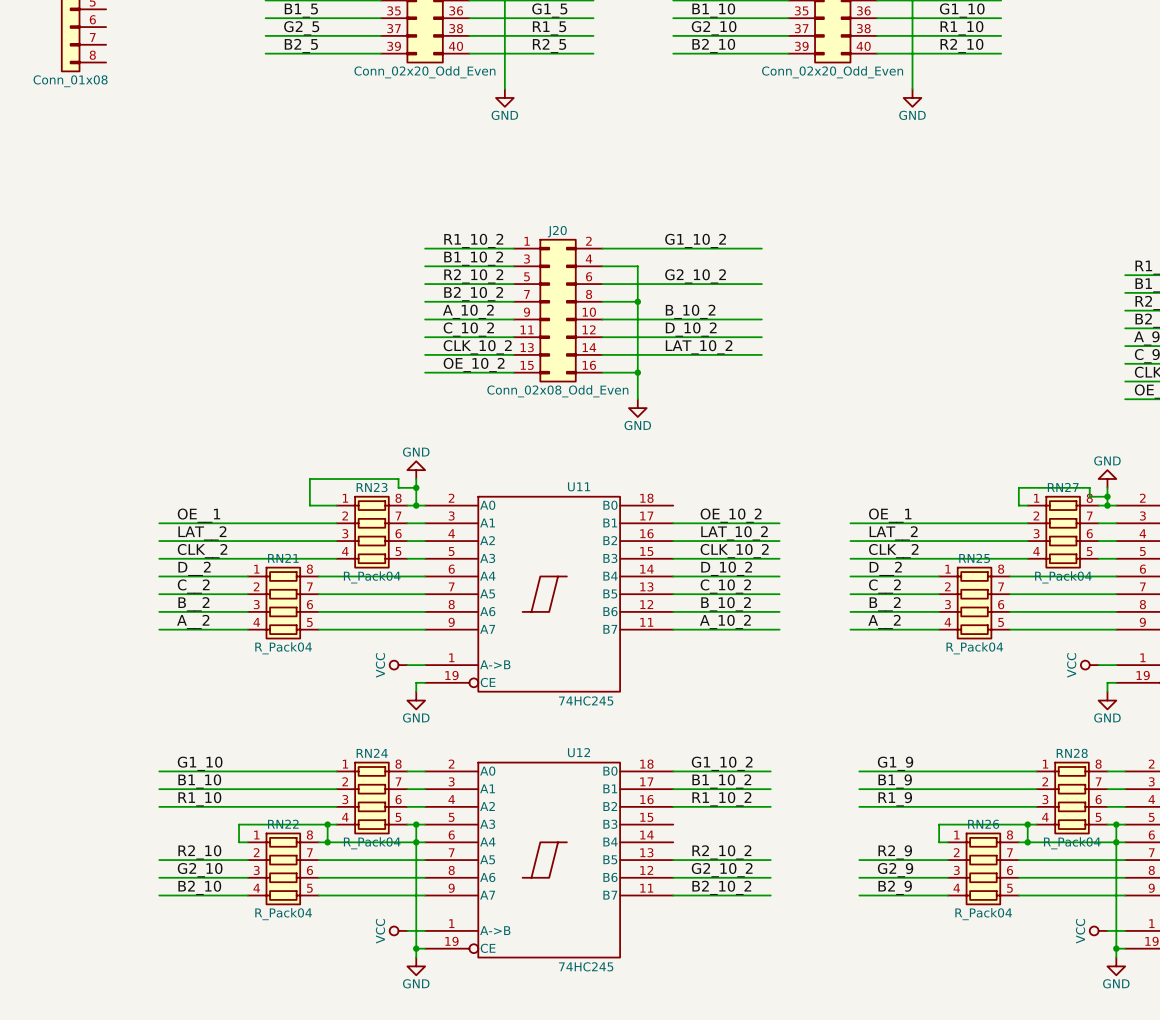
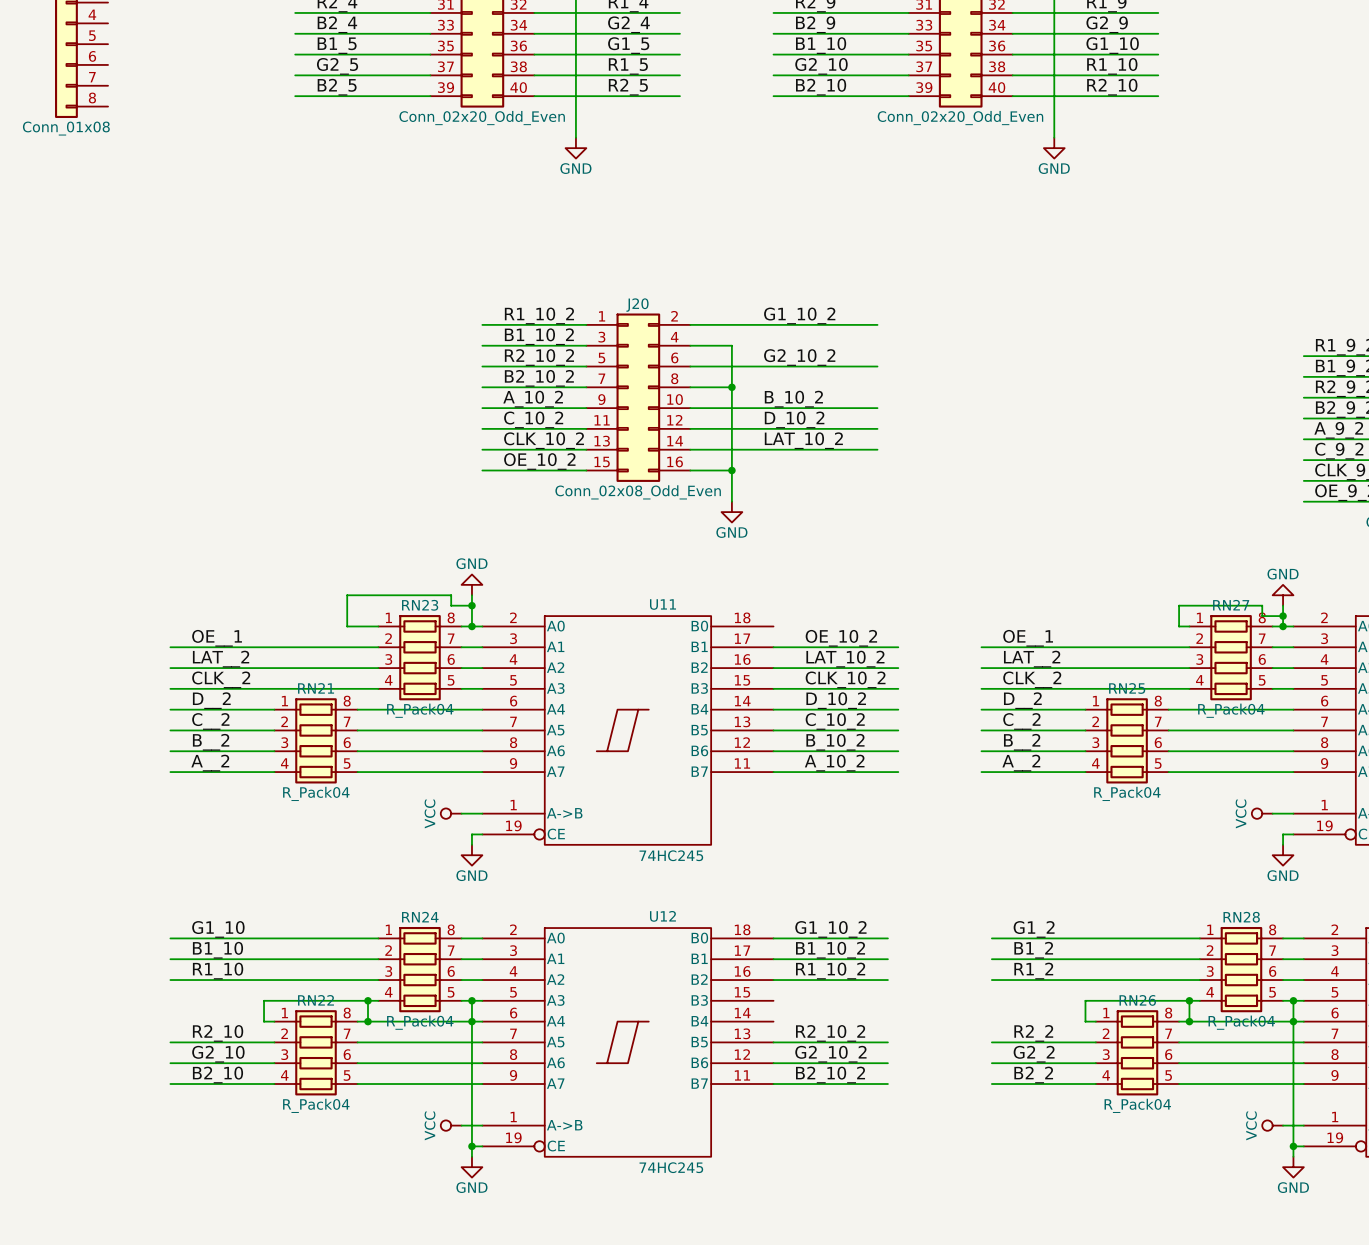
label: G1_9 (895, 763) -> G1_2 (1034, 929)
label: B1_9 (895, 781) -> B1_2 (1033, 950)
label: R1_9 (895, 799) -> R1_2 (1033, 971)
label: R2_9 (895, 852) -> R2_2 (1033, 1033)
label: G2_9 (895, 870) -> G2_2 (1034, 1054)
label: B2_9 (895, 887) -> B2_2 (1033, 1075)

